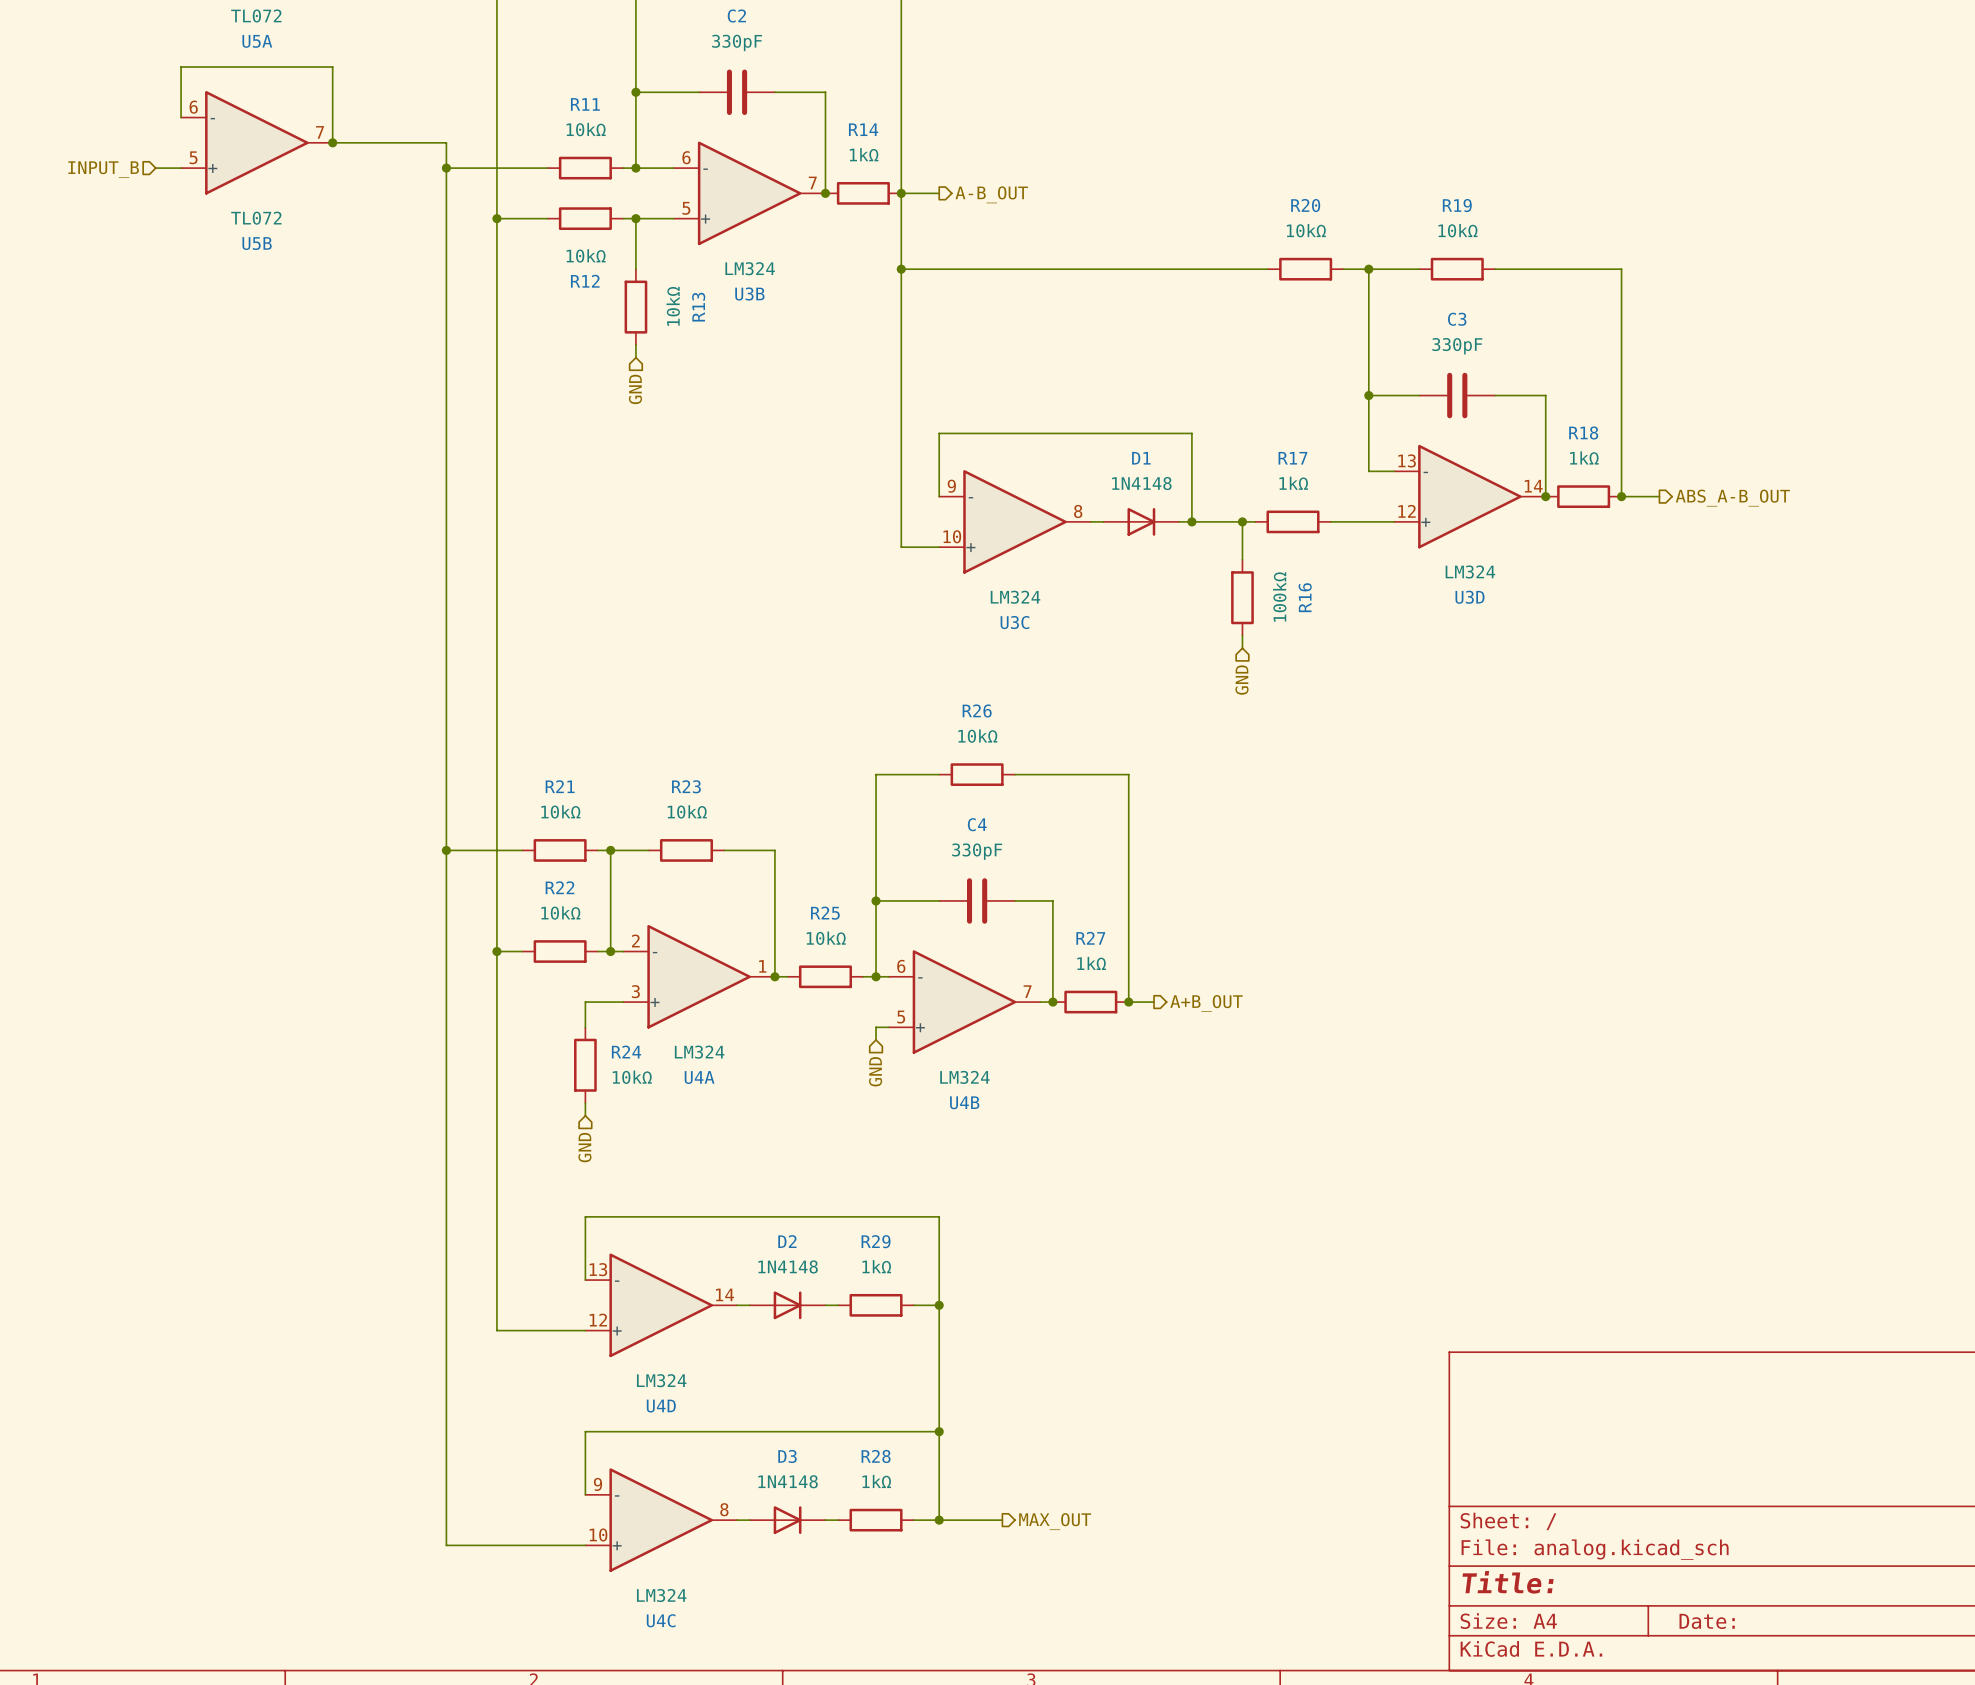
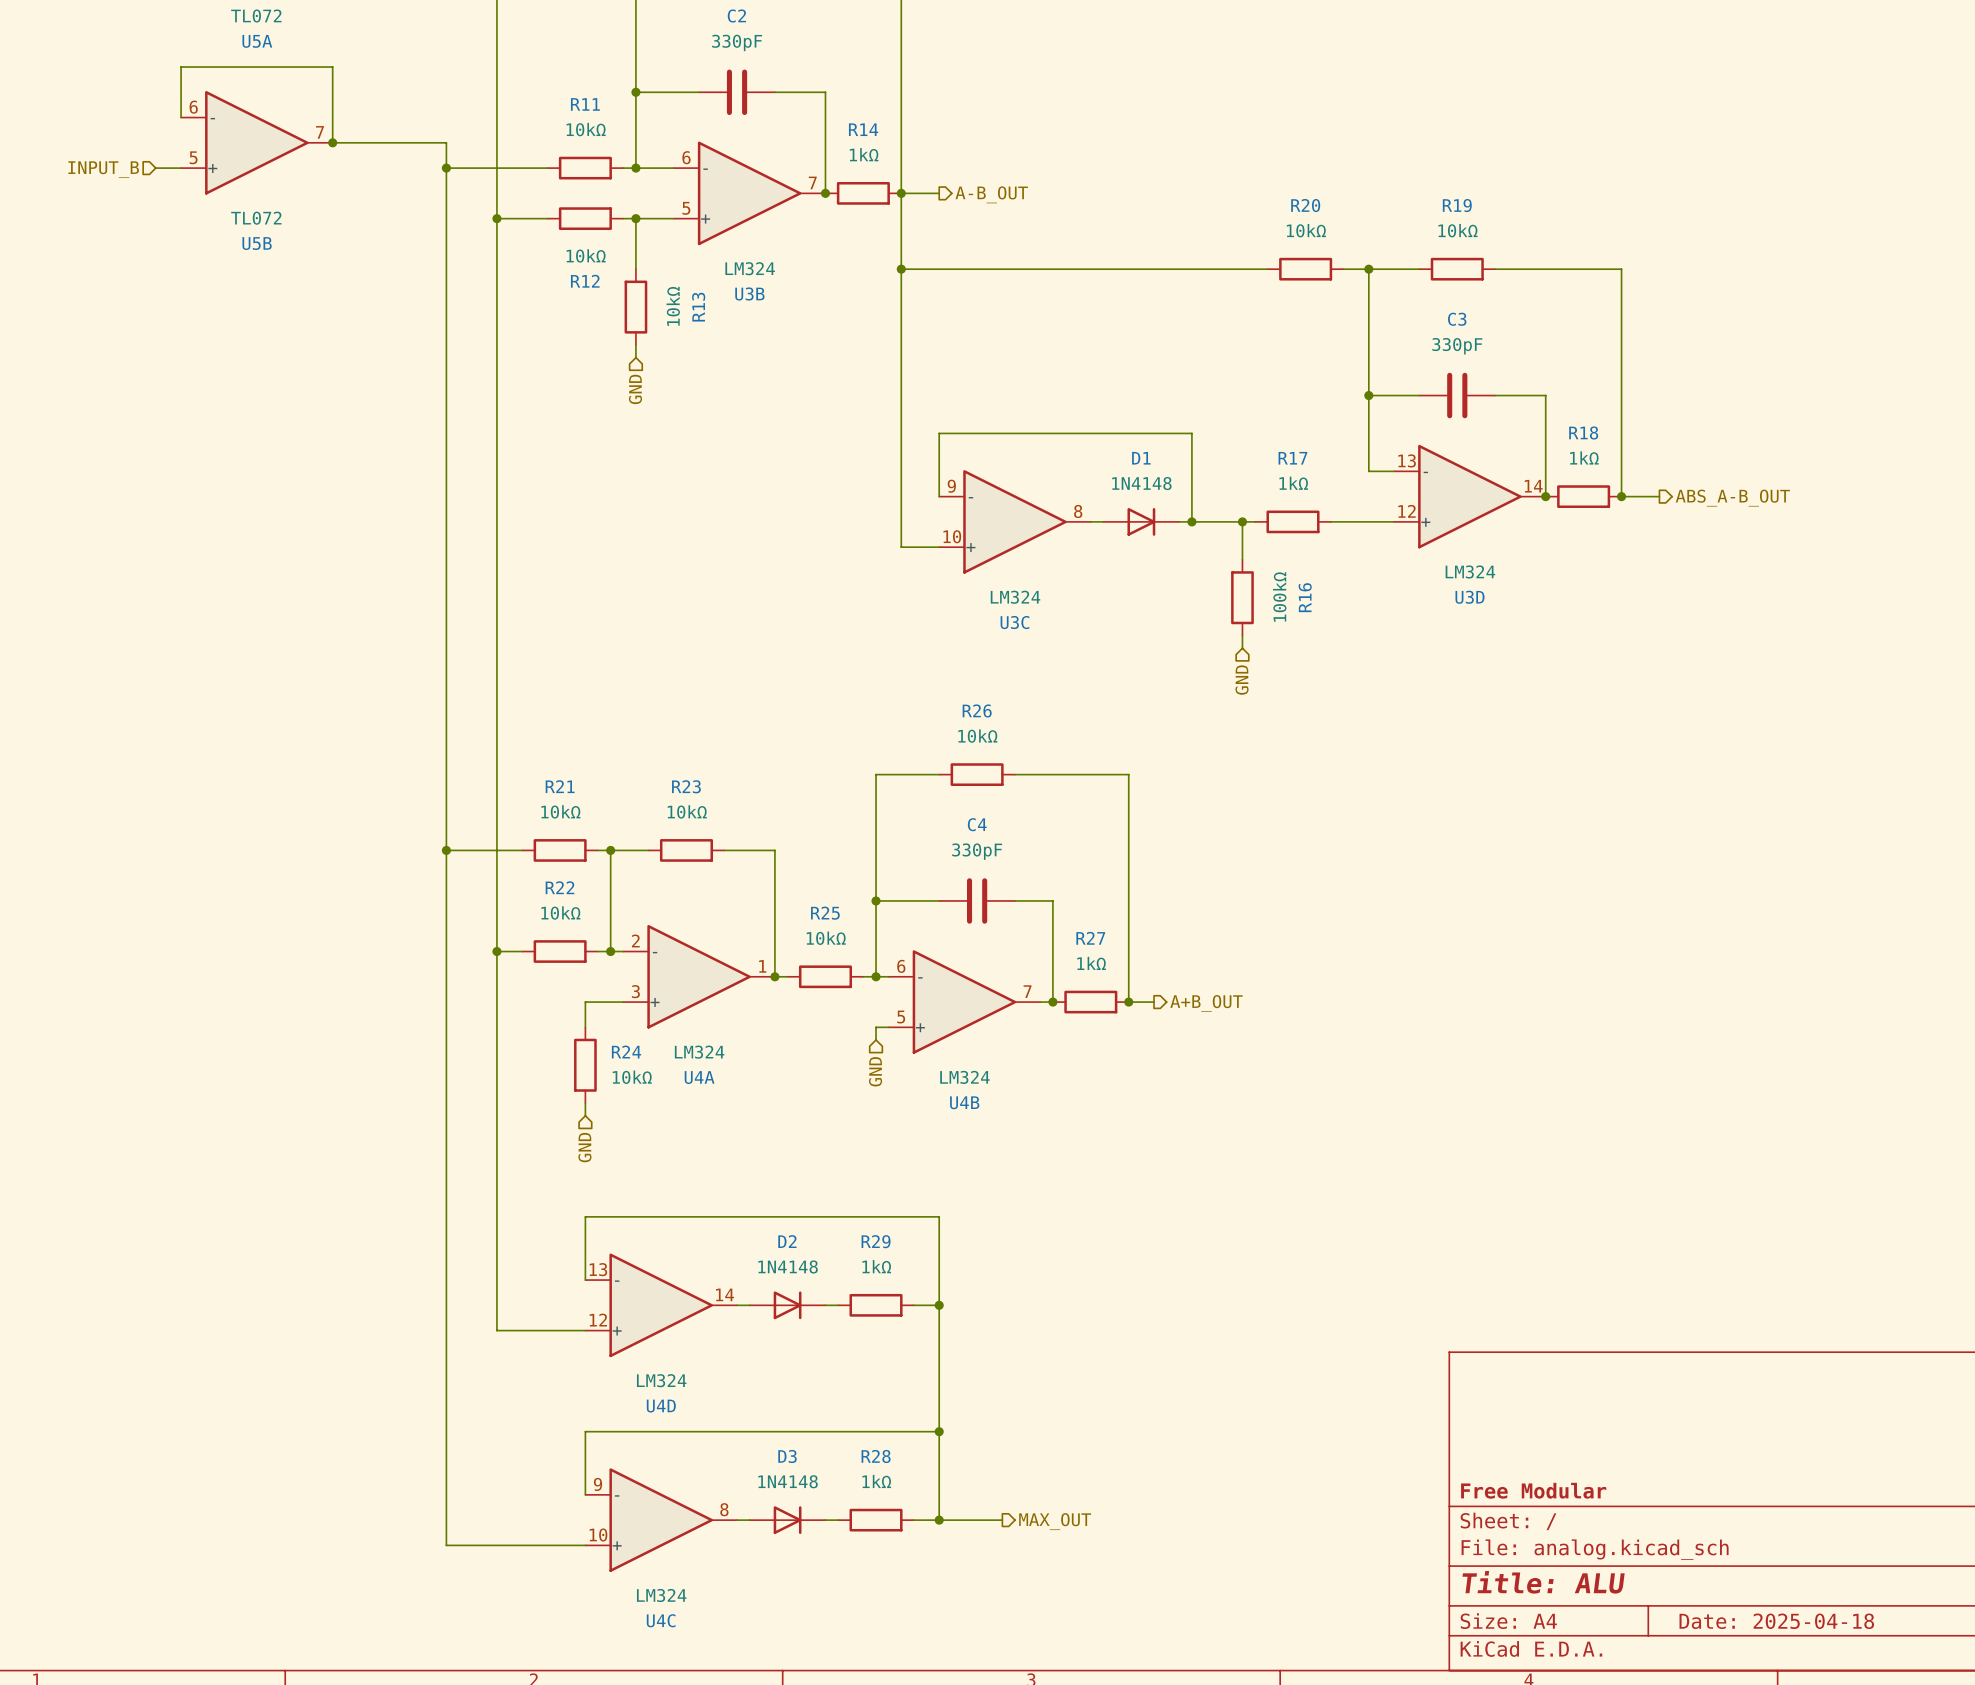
title block: none -> Free Modular (1533, 1490)
title block: Title: (1508, 1582) -> Title: ALU (1543, 1582)
title block: Date: (1707, 1621) -> Date: 2025-04-18 (1776, 1621)

